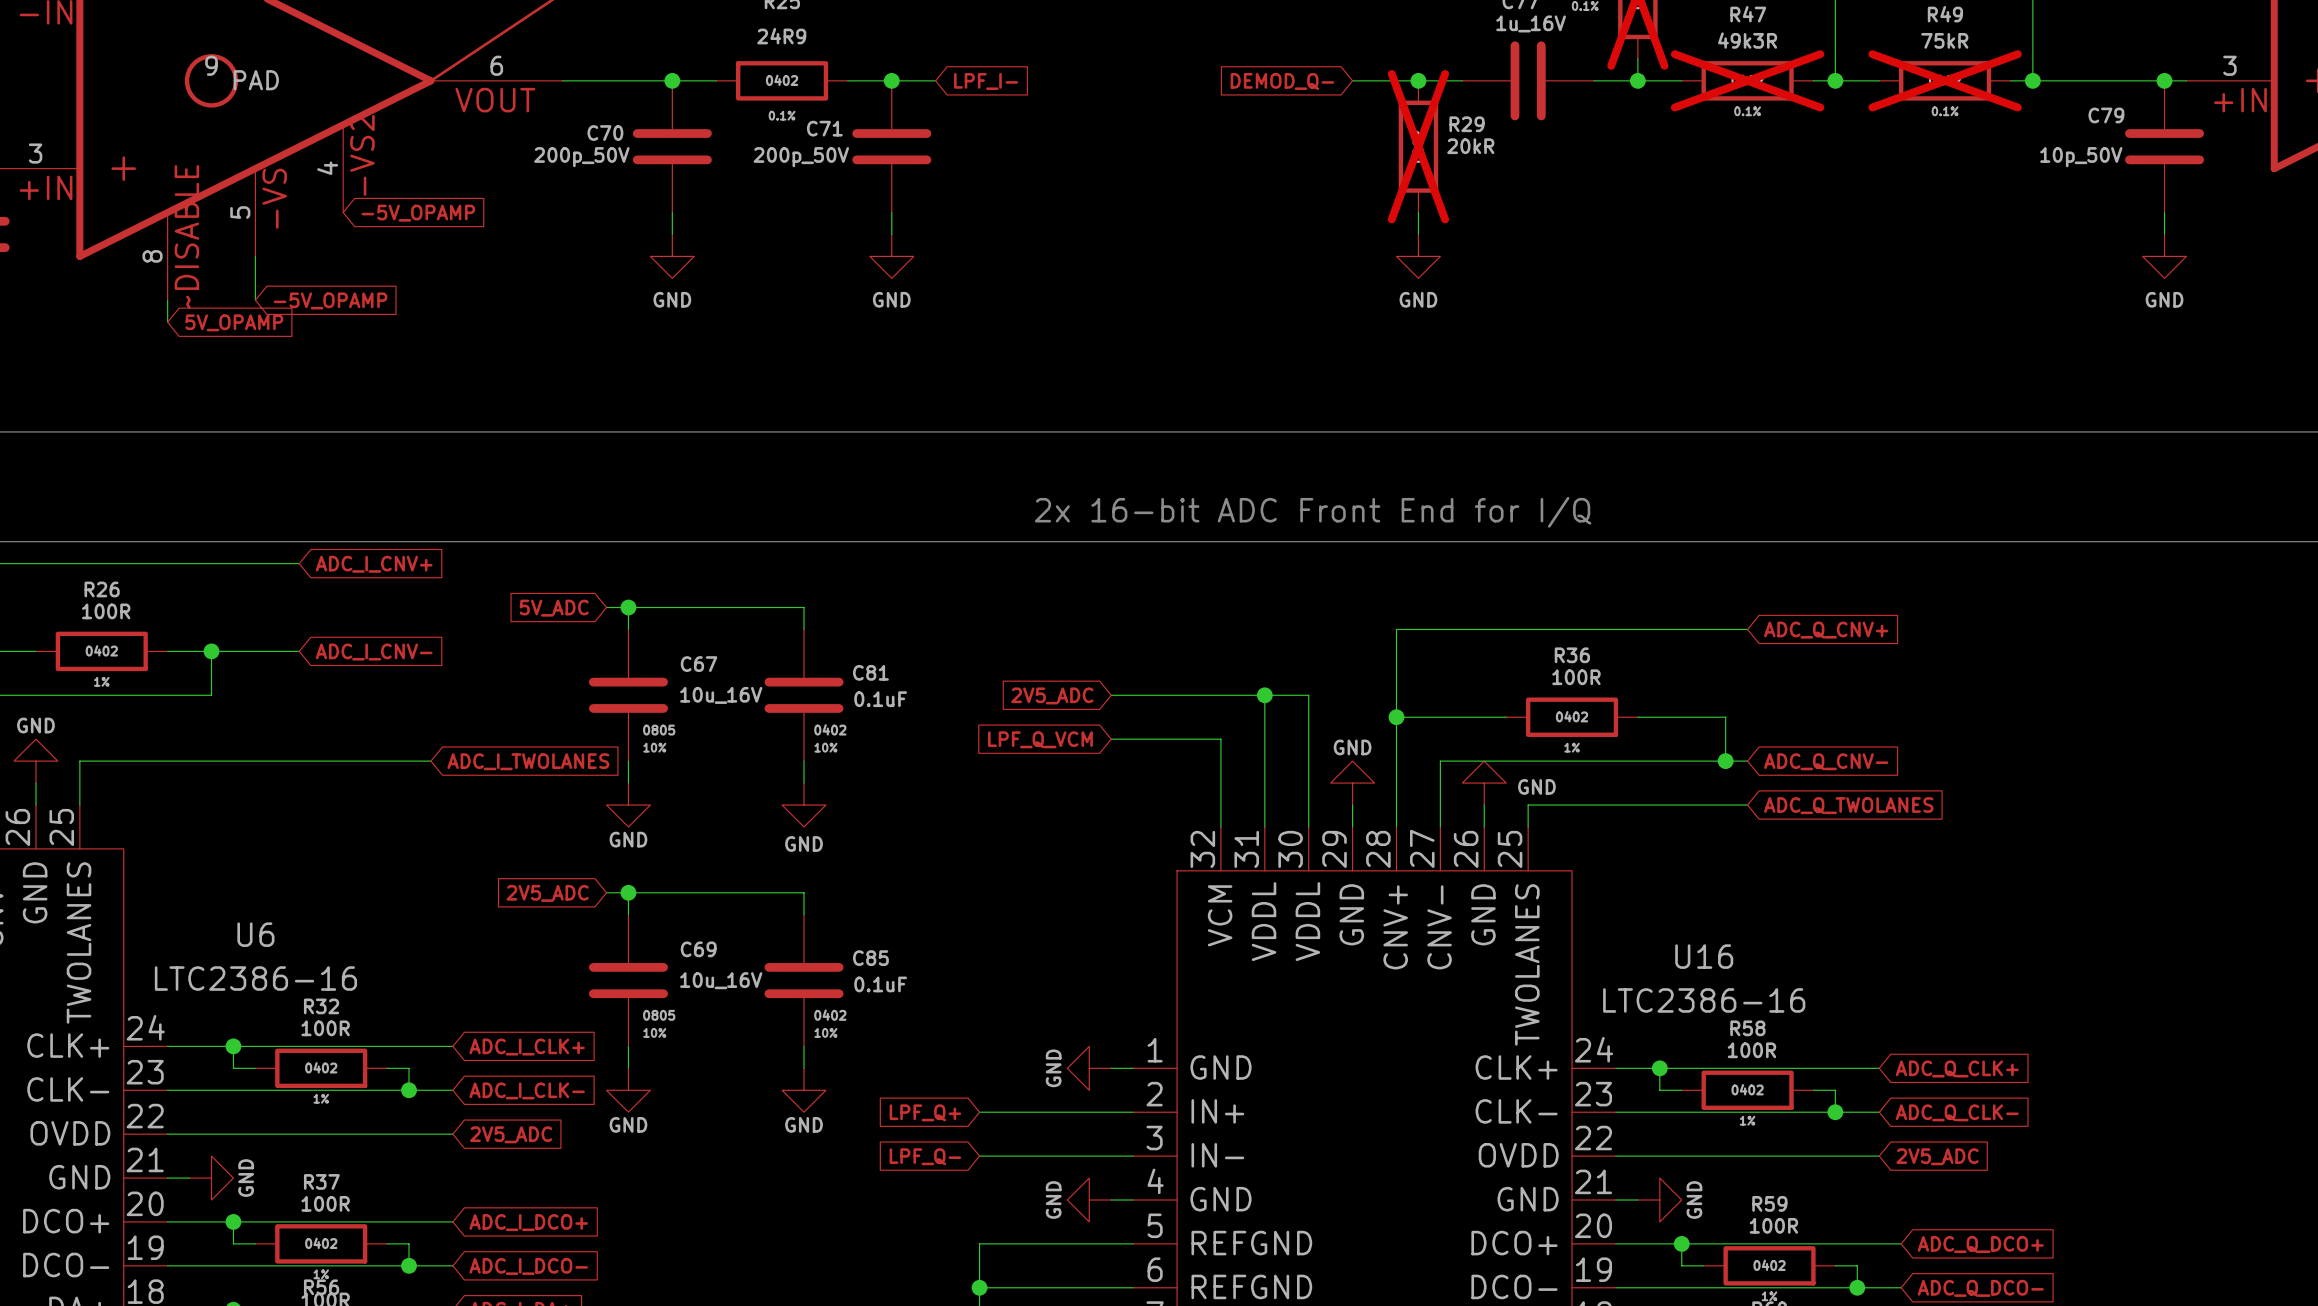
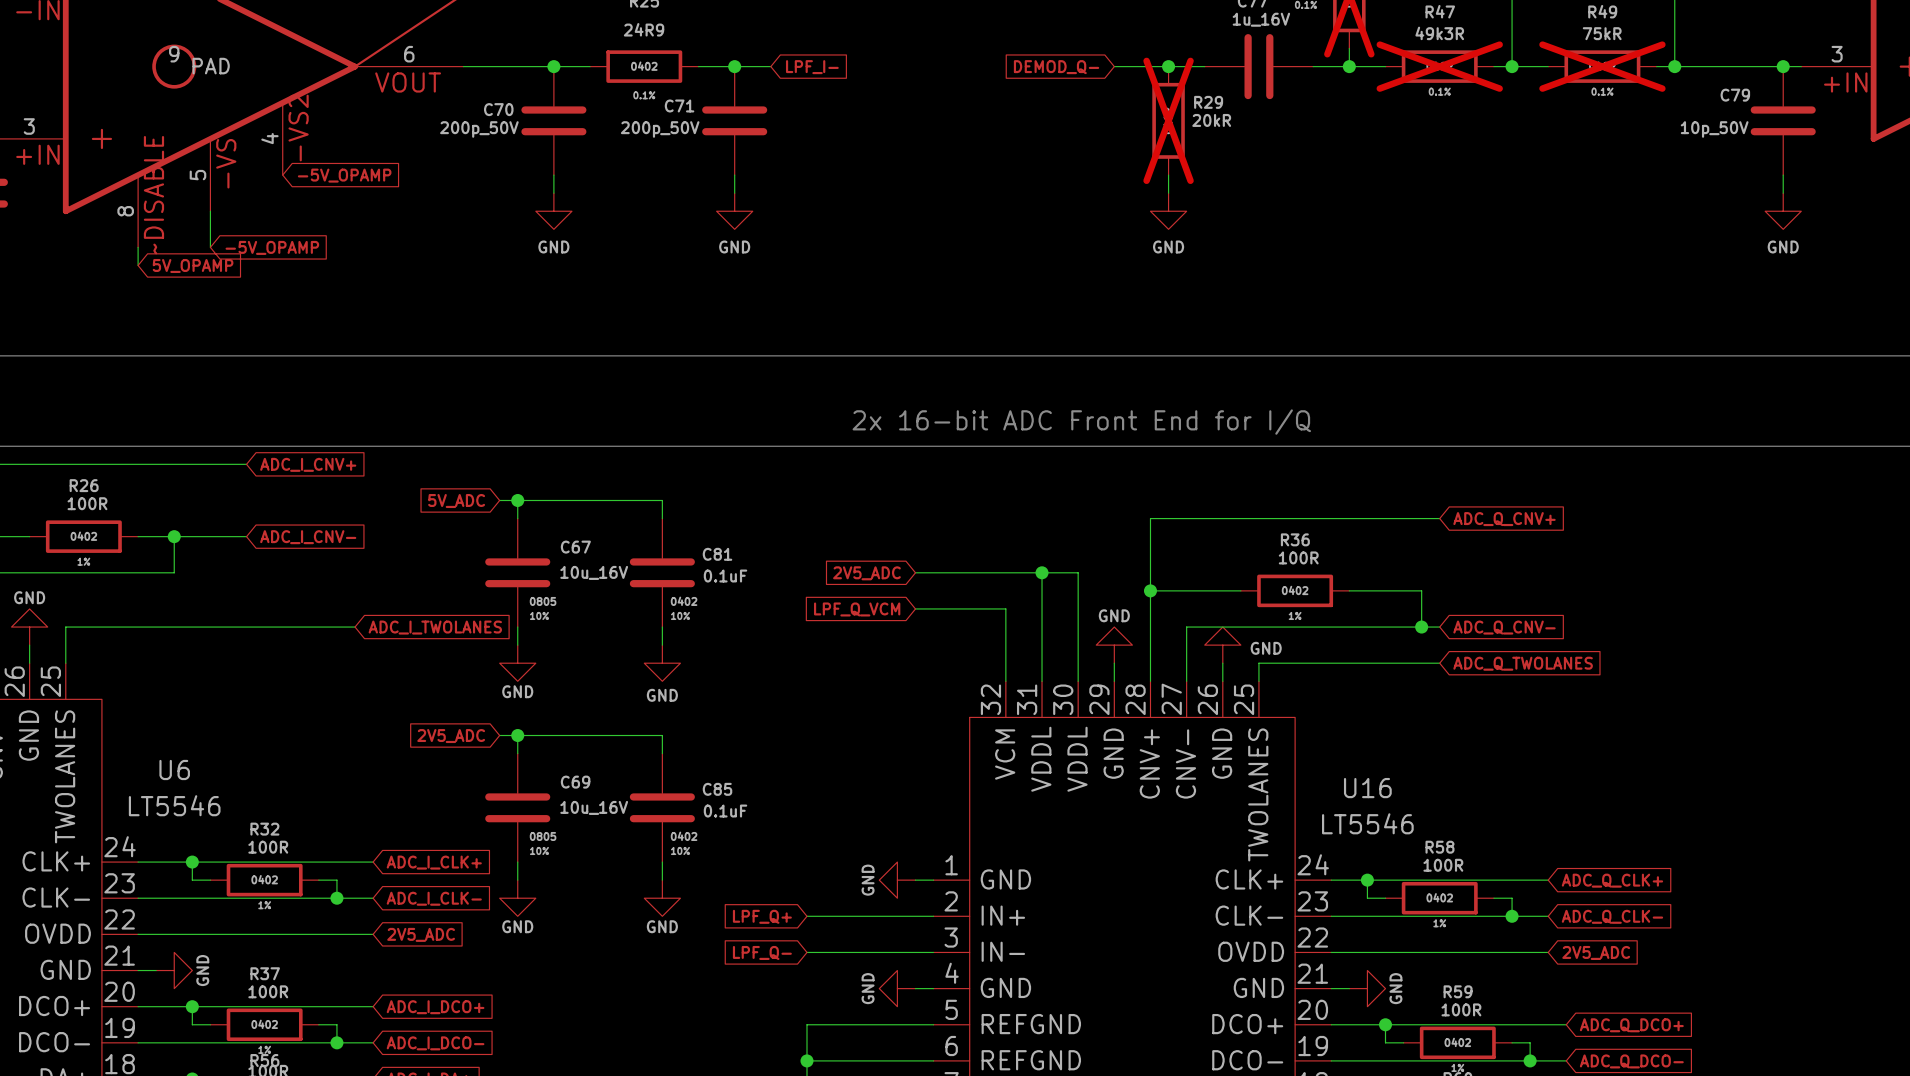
U6 name position: U6 (255, 934) -> U6 (174, 769)
U16 name position: U16 (1704, 956) -> U16 (1367, 788)
U6 value: LTC2386-16 (255, 978) -> LT5546 (174, 805)
U16 value: LTC2386-16 (1704, 1000) -> LT5546 (1367, 823)

